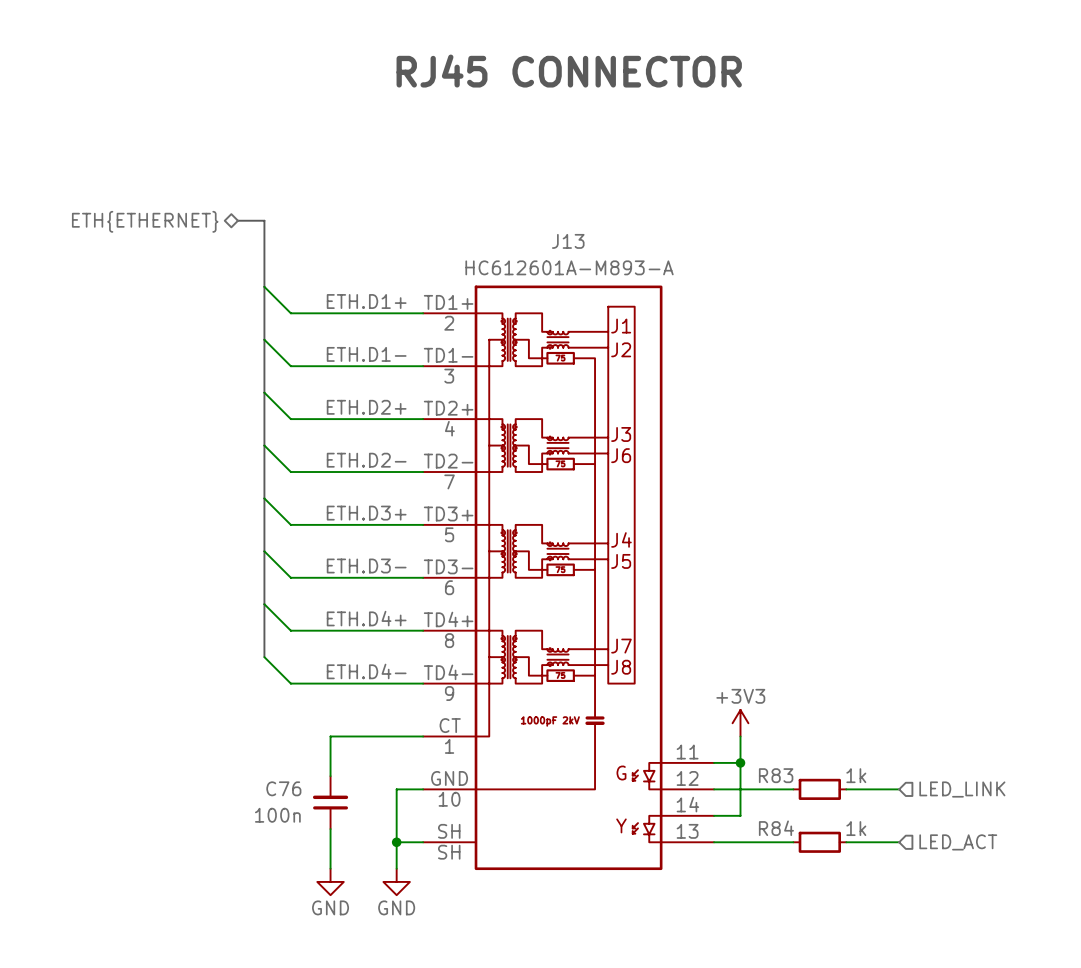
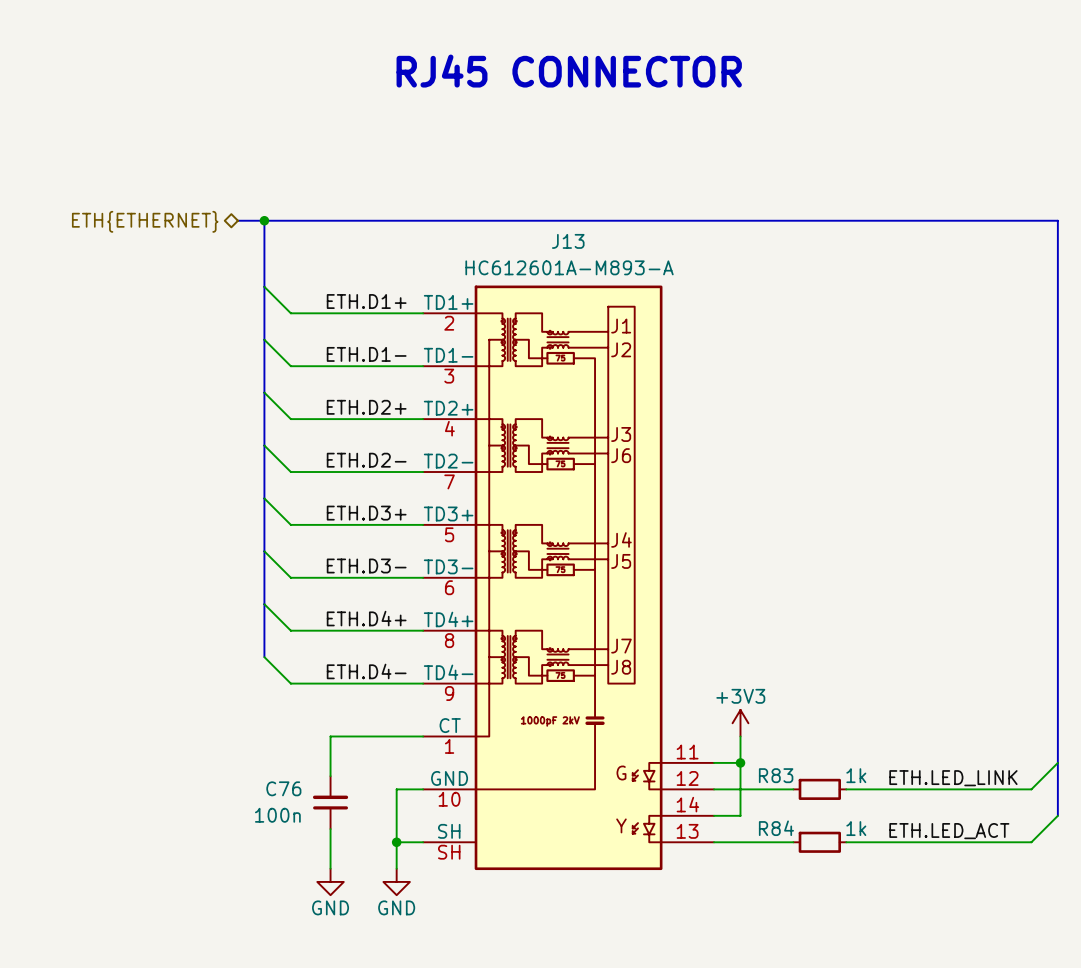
bus: none -> (264, 220) (1057, 220) (1057, 815)
junction: none -> (264, 220)
wire: none -> (1057, 762) (1031, 789) (899, 789)
label: none -> ETH.LED_LINK (953, 778)
hierarchical label: LED_LINK (962, 789) -> none
wire: none -> (1057, 815) (1031, 842) (899, 842)
label: none -> ETH.LED_ACT (949, 831)
hierarchical label: LED_ACT (958, 842) -> none

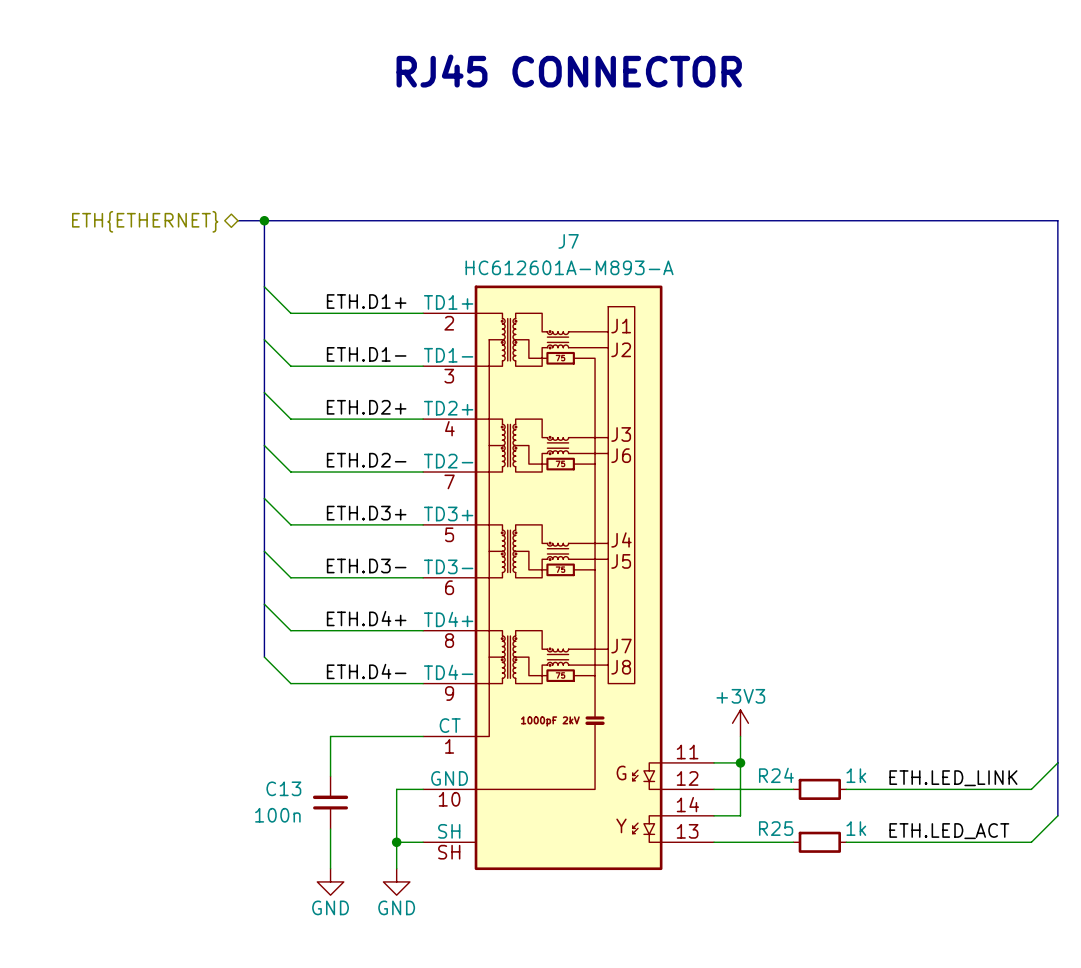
J13 name: J13 (568, 241) -> J7 (568, 241)
R83 name: R83 (776, 775) -> R24 (776, 775)
C76 name: C76 (283, 788) -> C13 (283, 788)
R84 name: R84 (776, 828) -> R25 (776, 828)

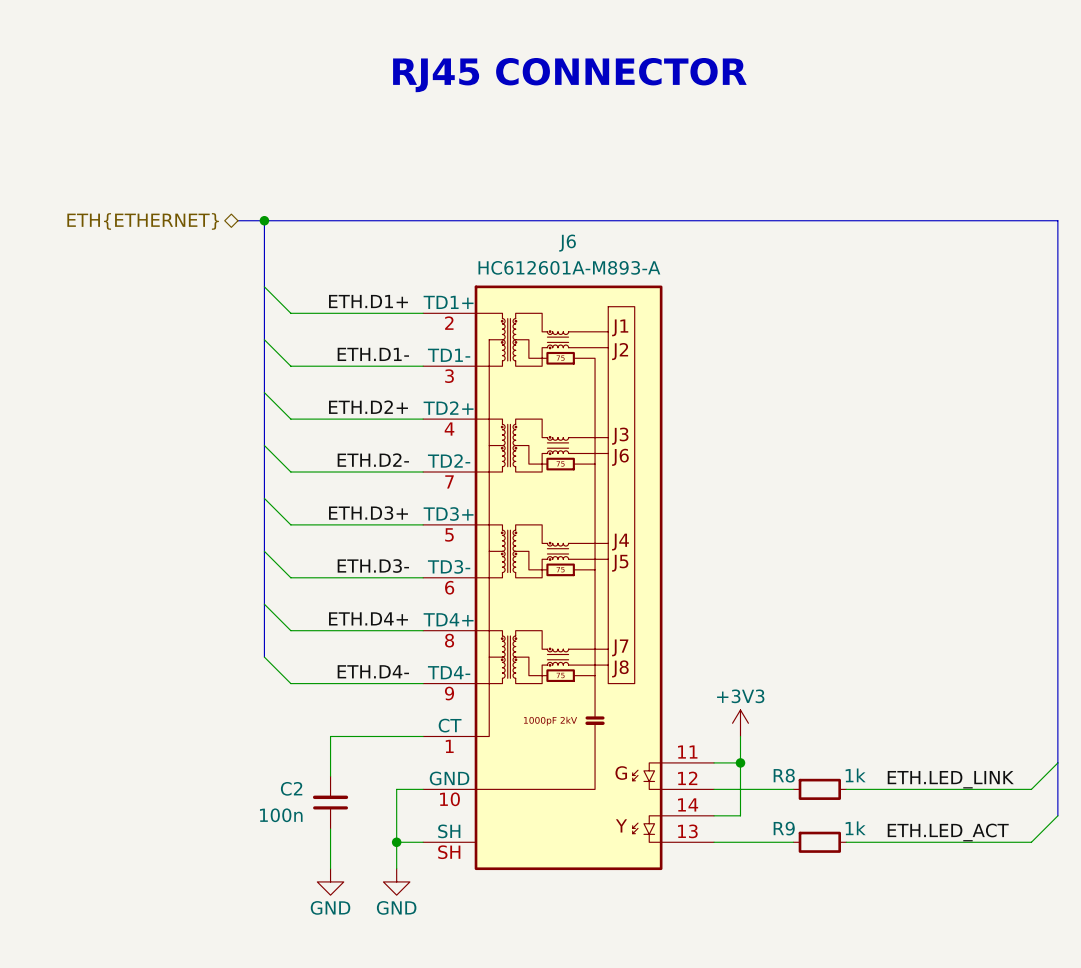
J7 name: J7 (568, 241) -> J6 (567, 243)
R24 name: R24 (776, 775) -> R8 (784, 775)
C13 name: C13 (283, 788) -> C2 (291, 788)
R25 name: R25 (776, 828) -> R9 (784, 828)

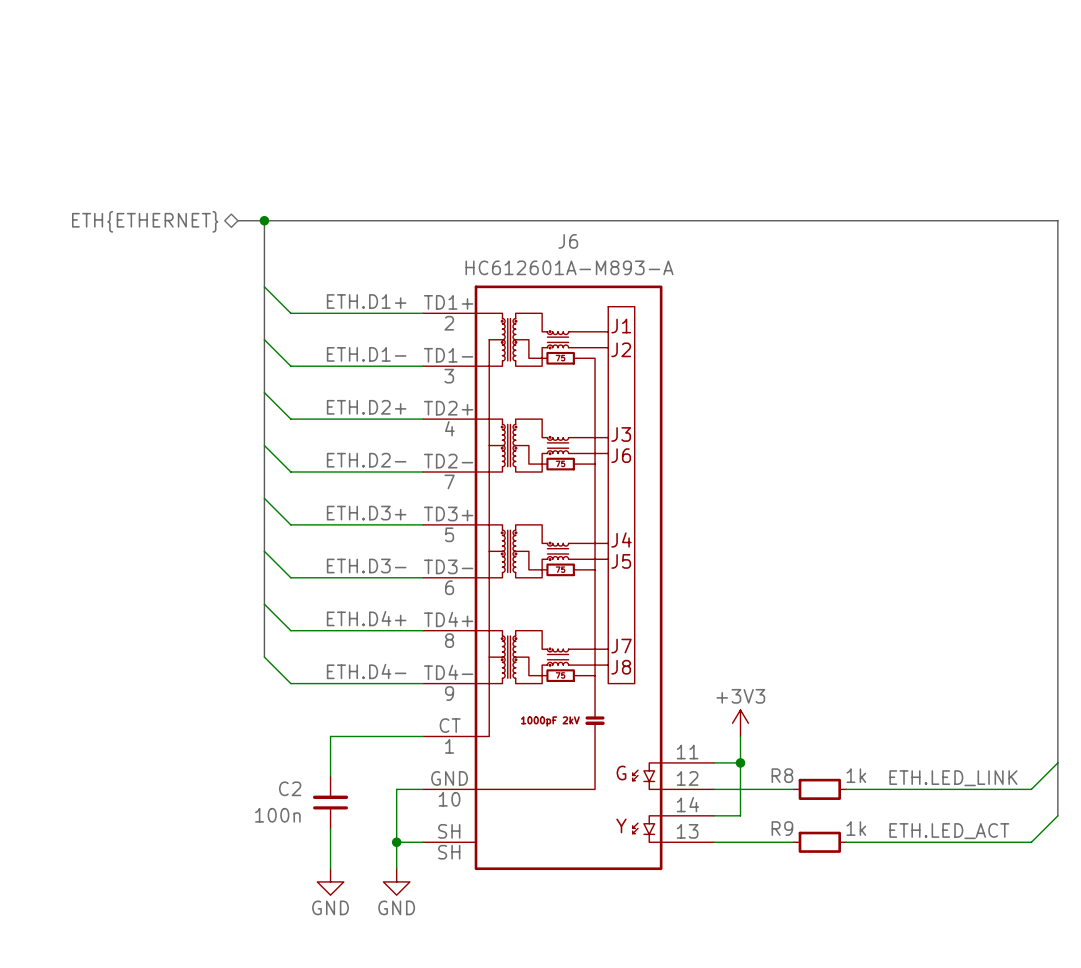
text: RJ45 CONNECTOR (569, 75) -> none

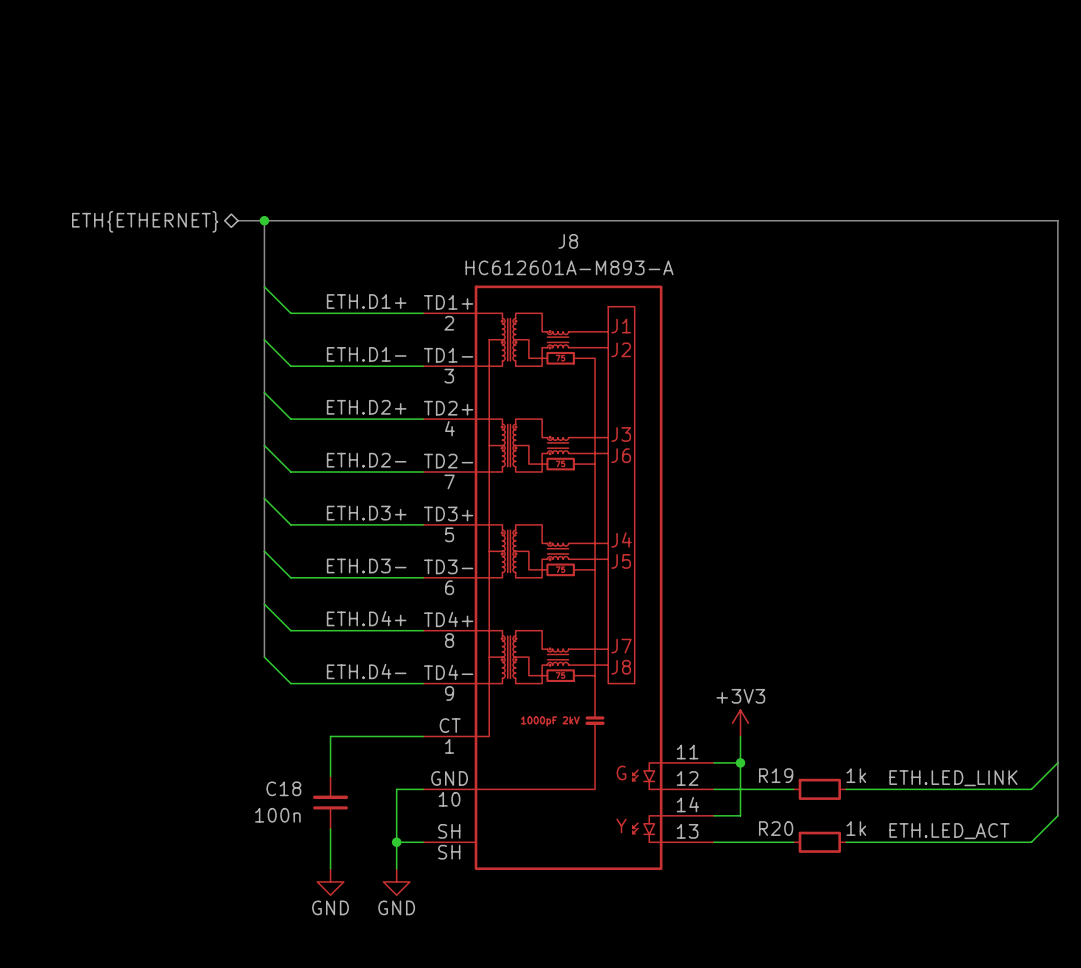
J6 name: J6 (568, 241) -> J8 (568, 241)
R8 name: R8 (782, 775) -> R19 (776, 775)
C2 name: C2 (290, 788) -> C18 (283, 788)
R9 name: R9 (782, 828) -> R20 (776, 828)

